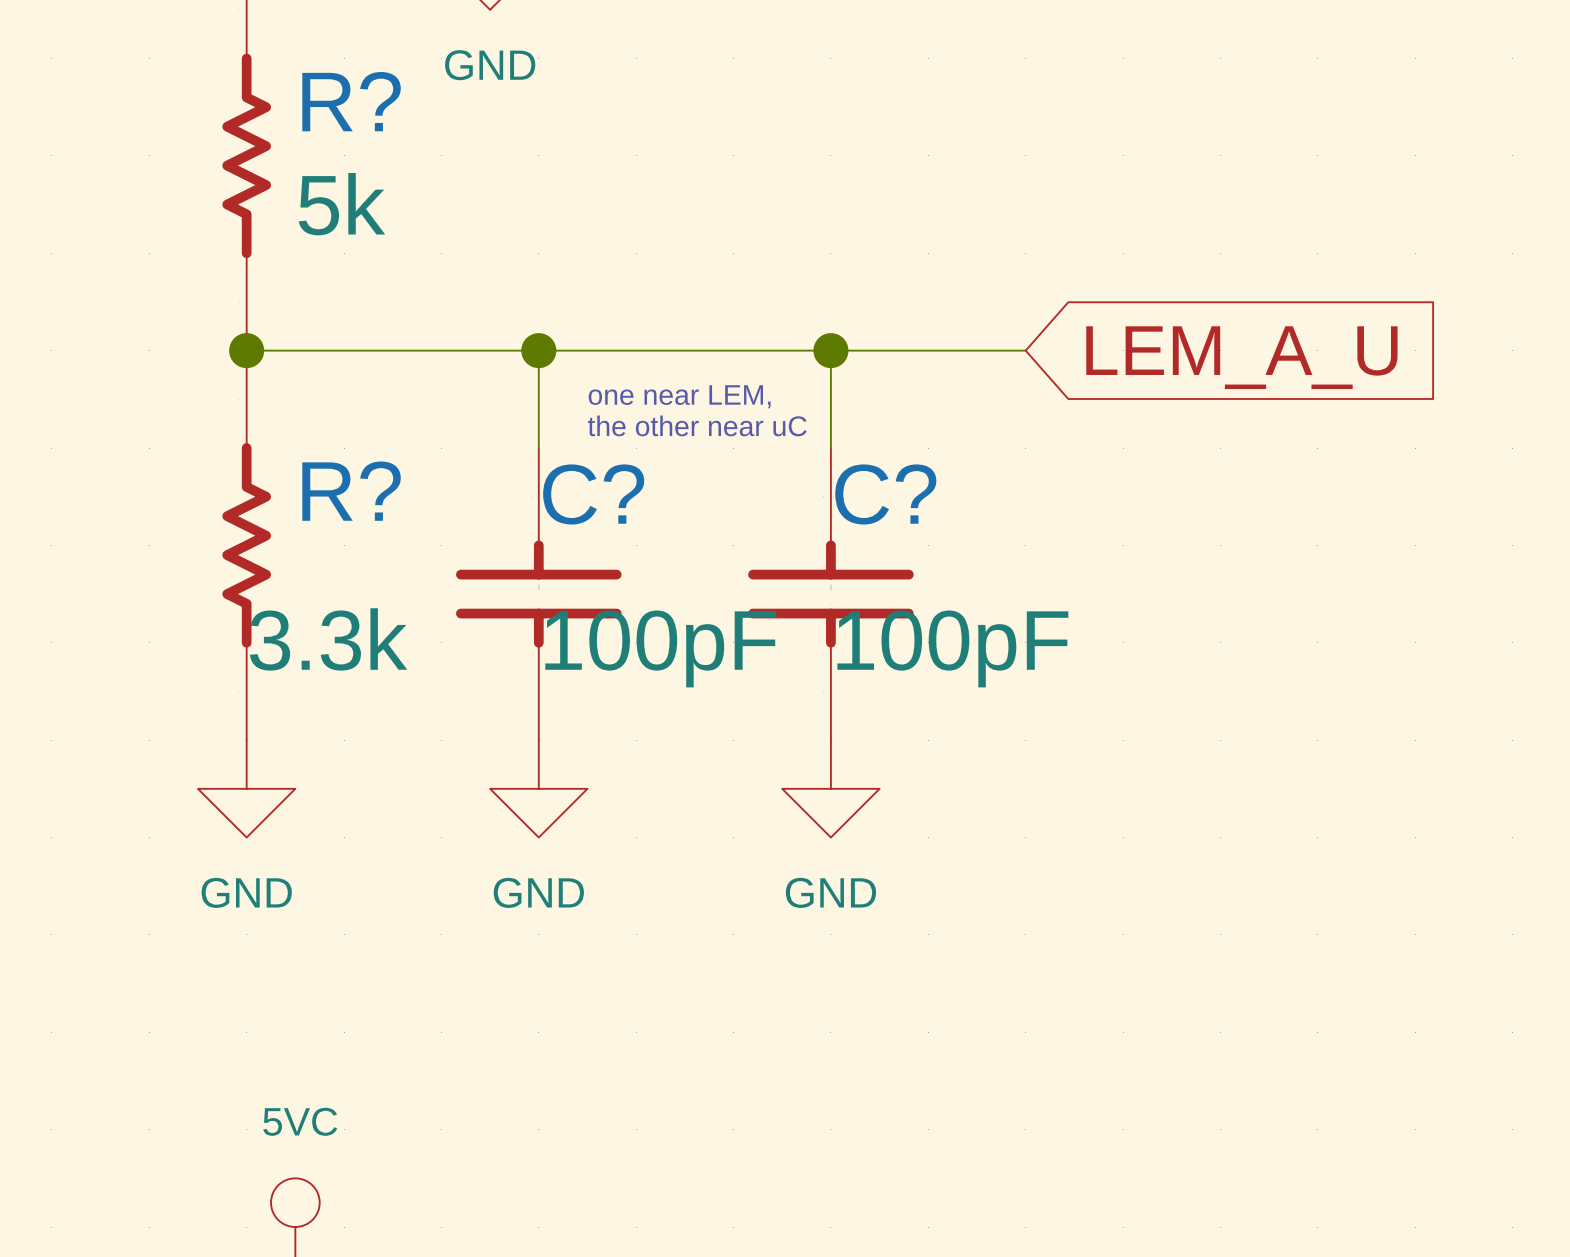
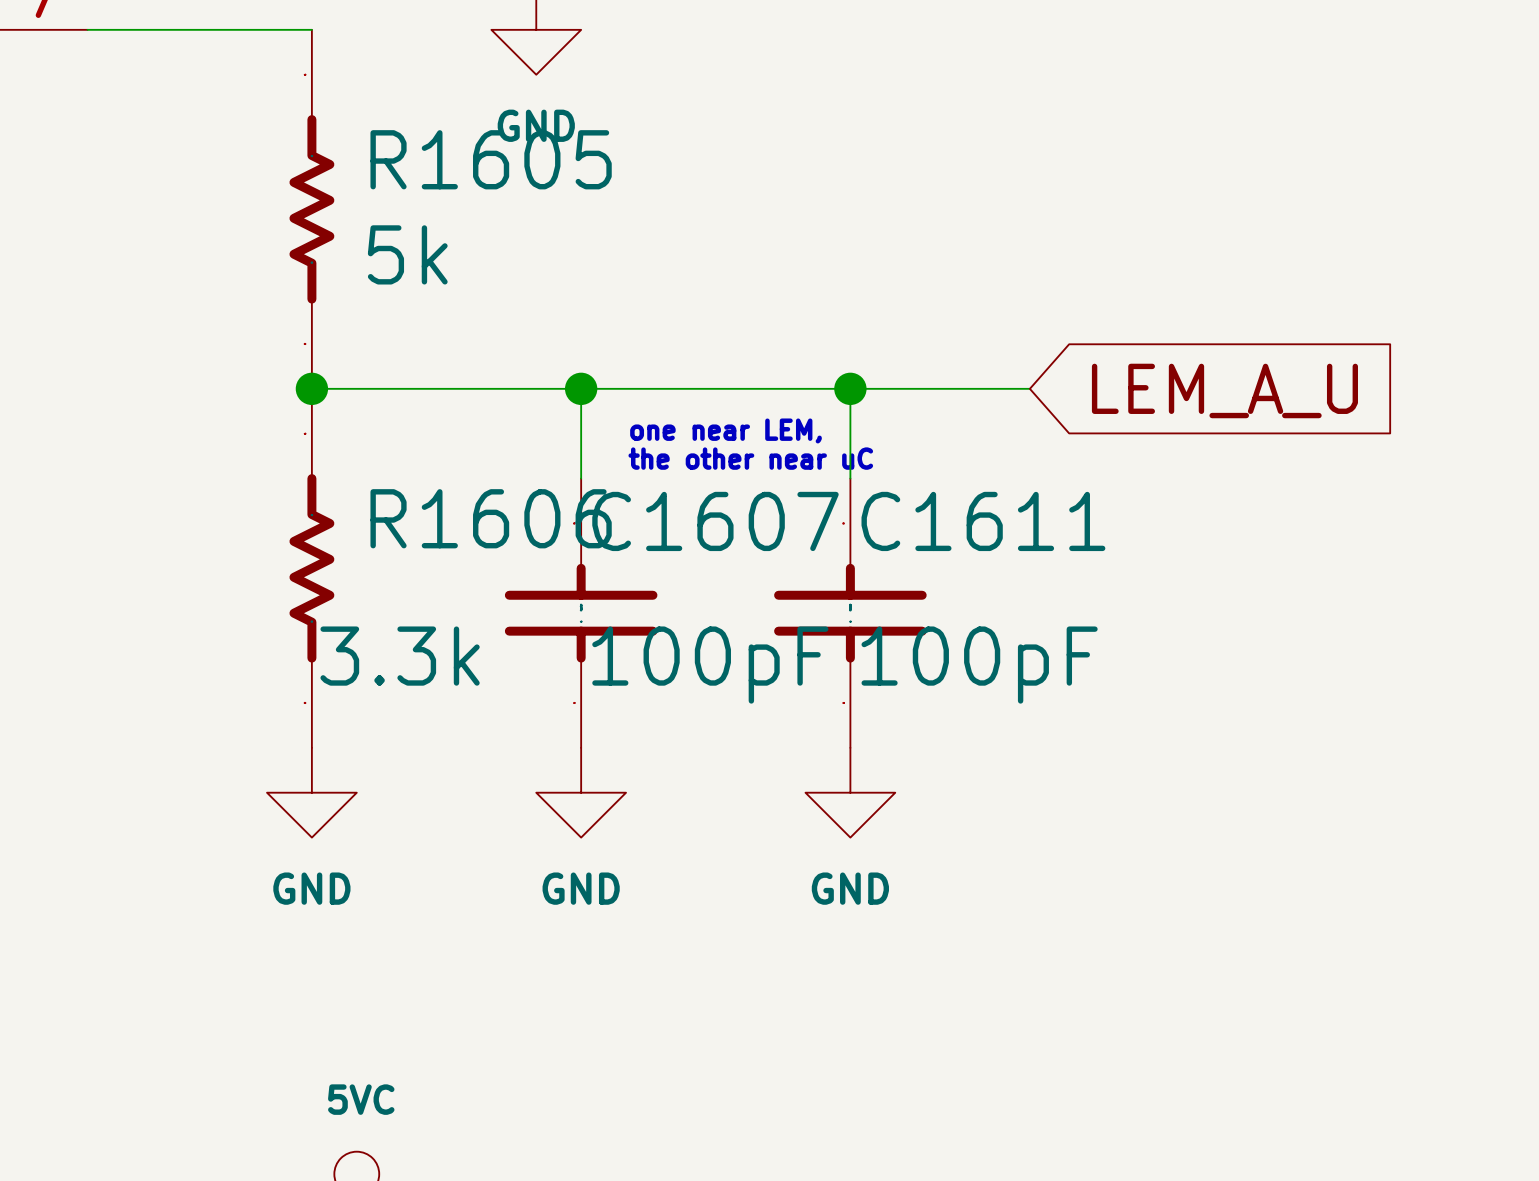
R? name: R? (351, 101) -> R1605 (491, 159)
R? name: R? (351, 491) -> R1606 (491, 518)
C? name: C? (593, 494) -> C1607 (715, 521)
C? name: C? (885, 494) -> C1611 (983, 521)

